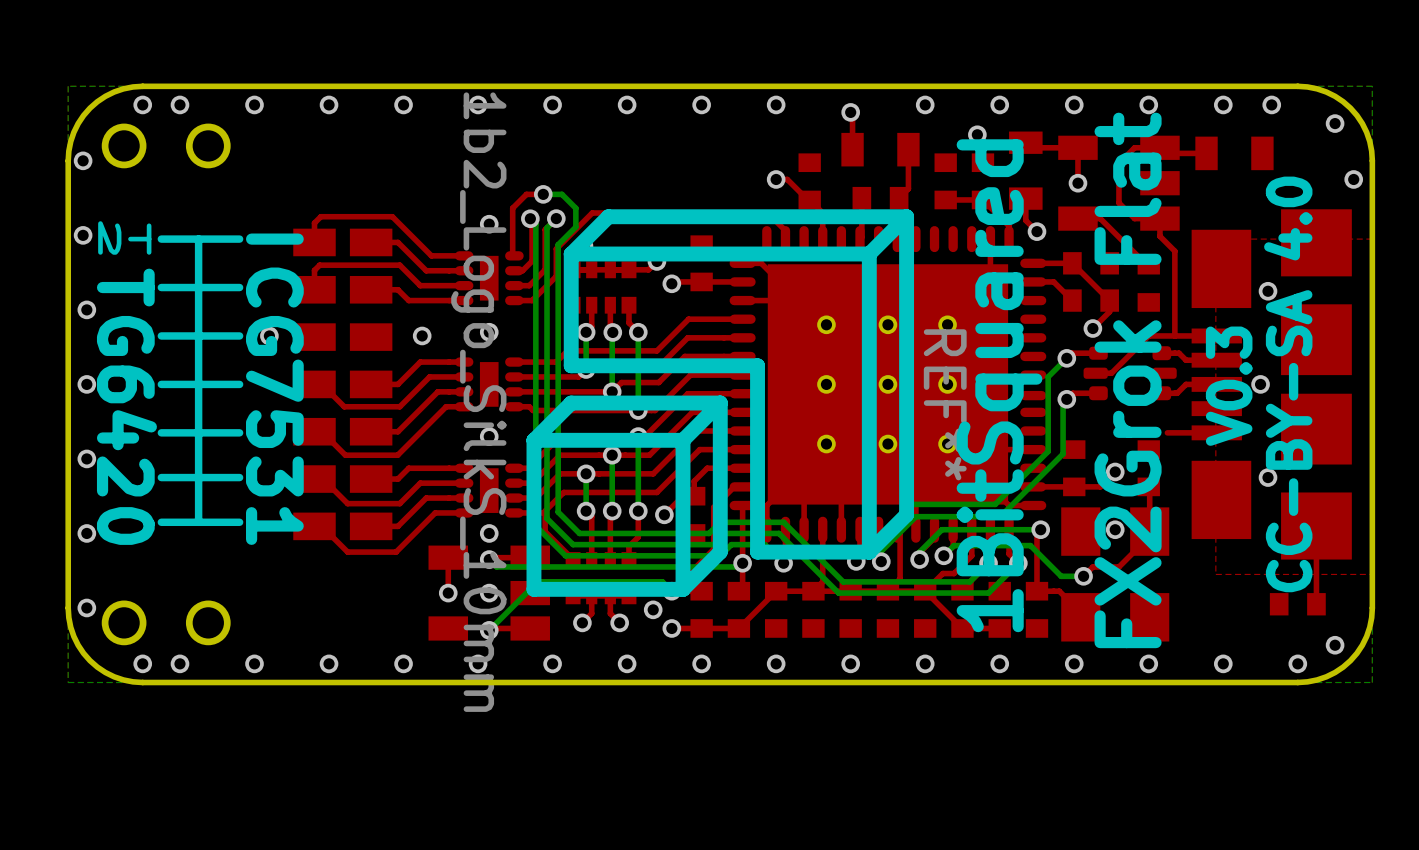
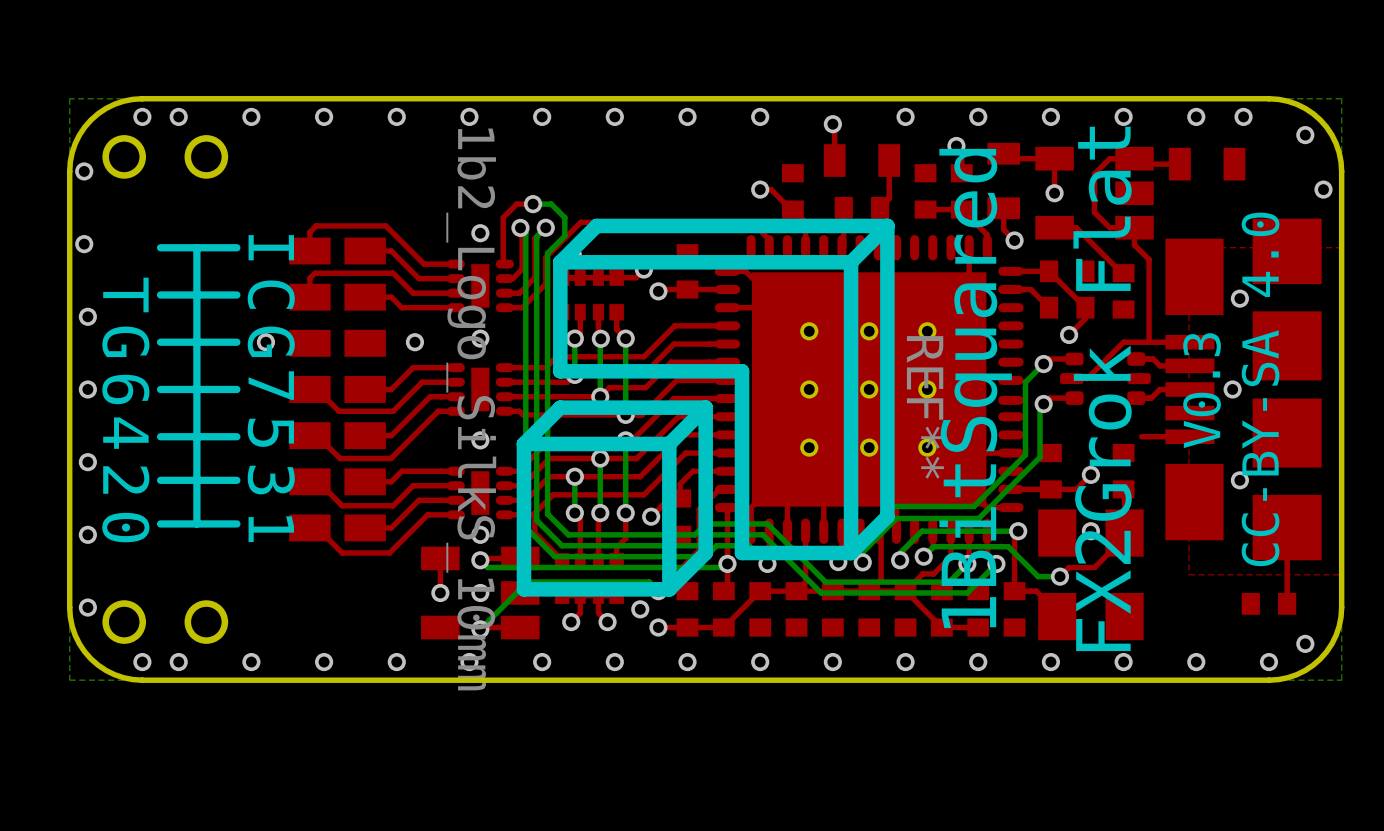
text: 2 (109, 237) -> none
text: T (139, 239) -> none

